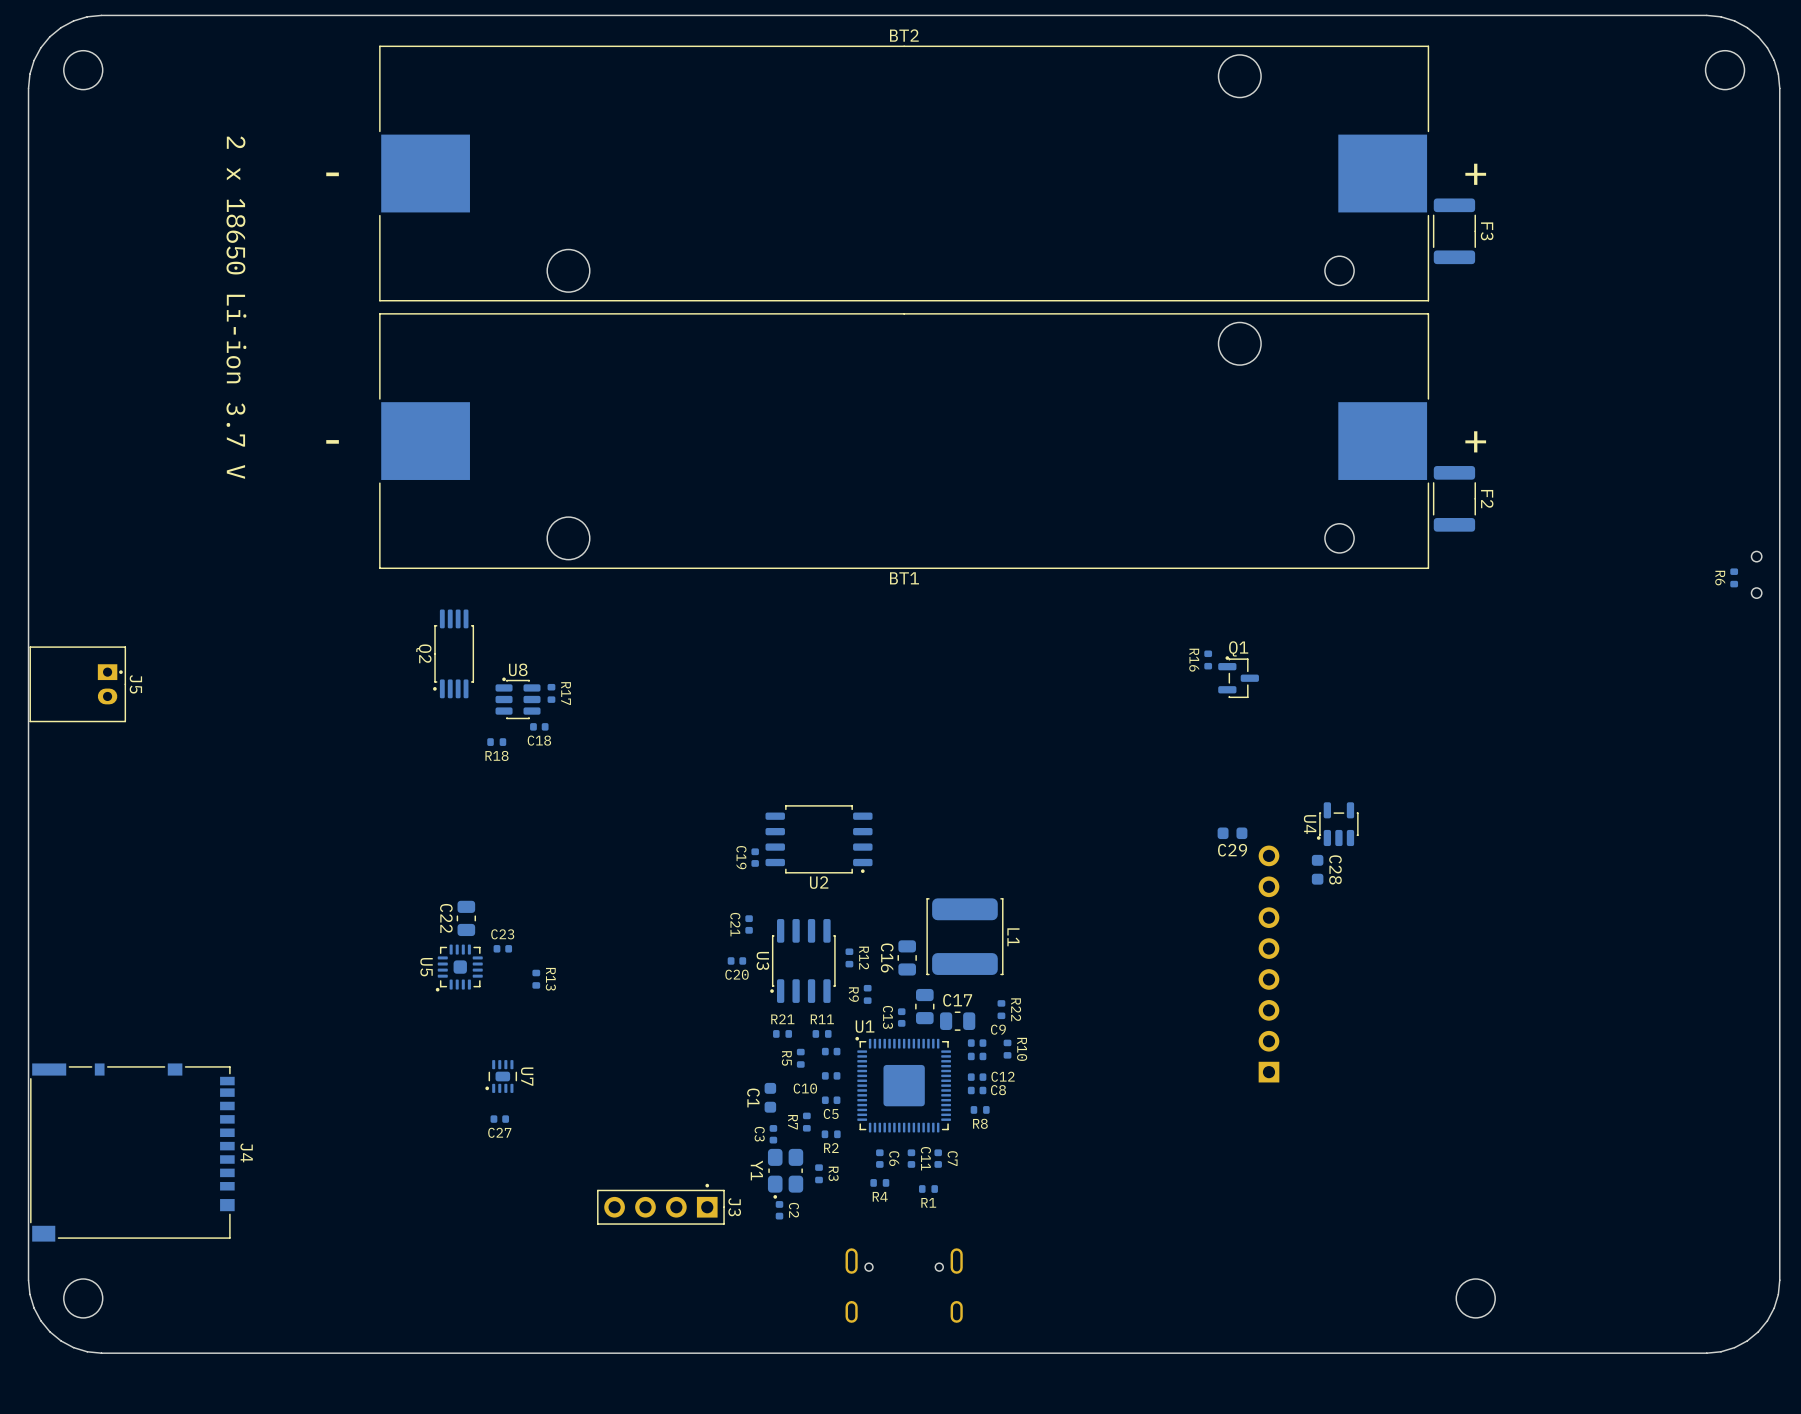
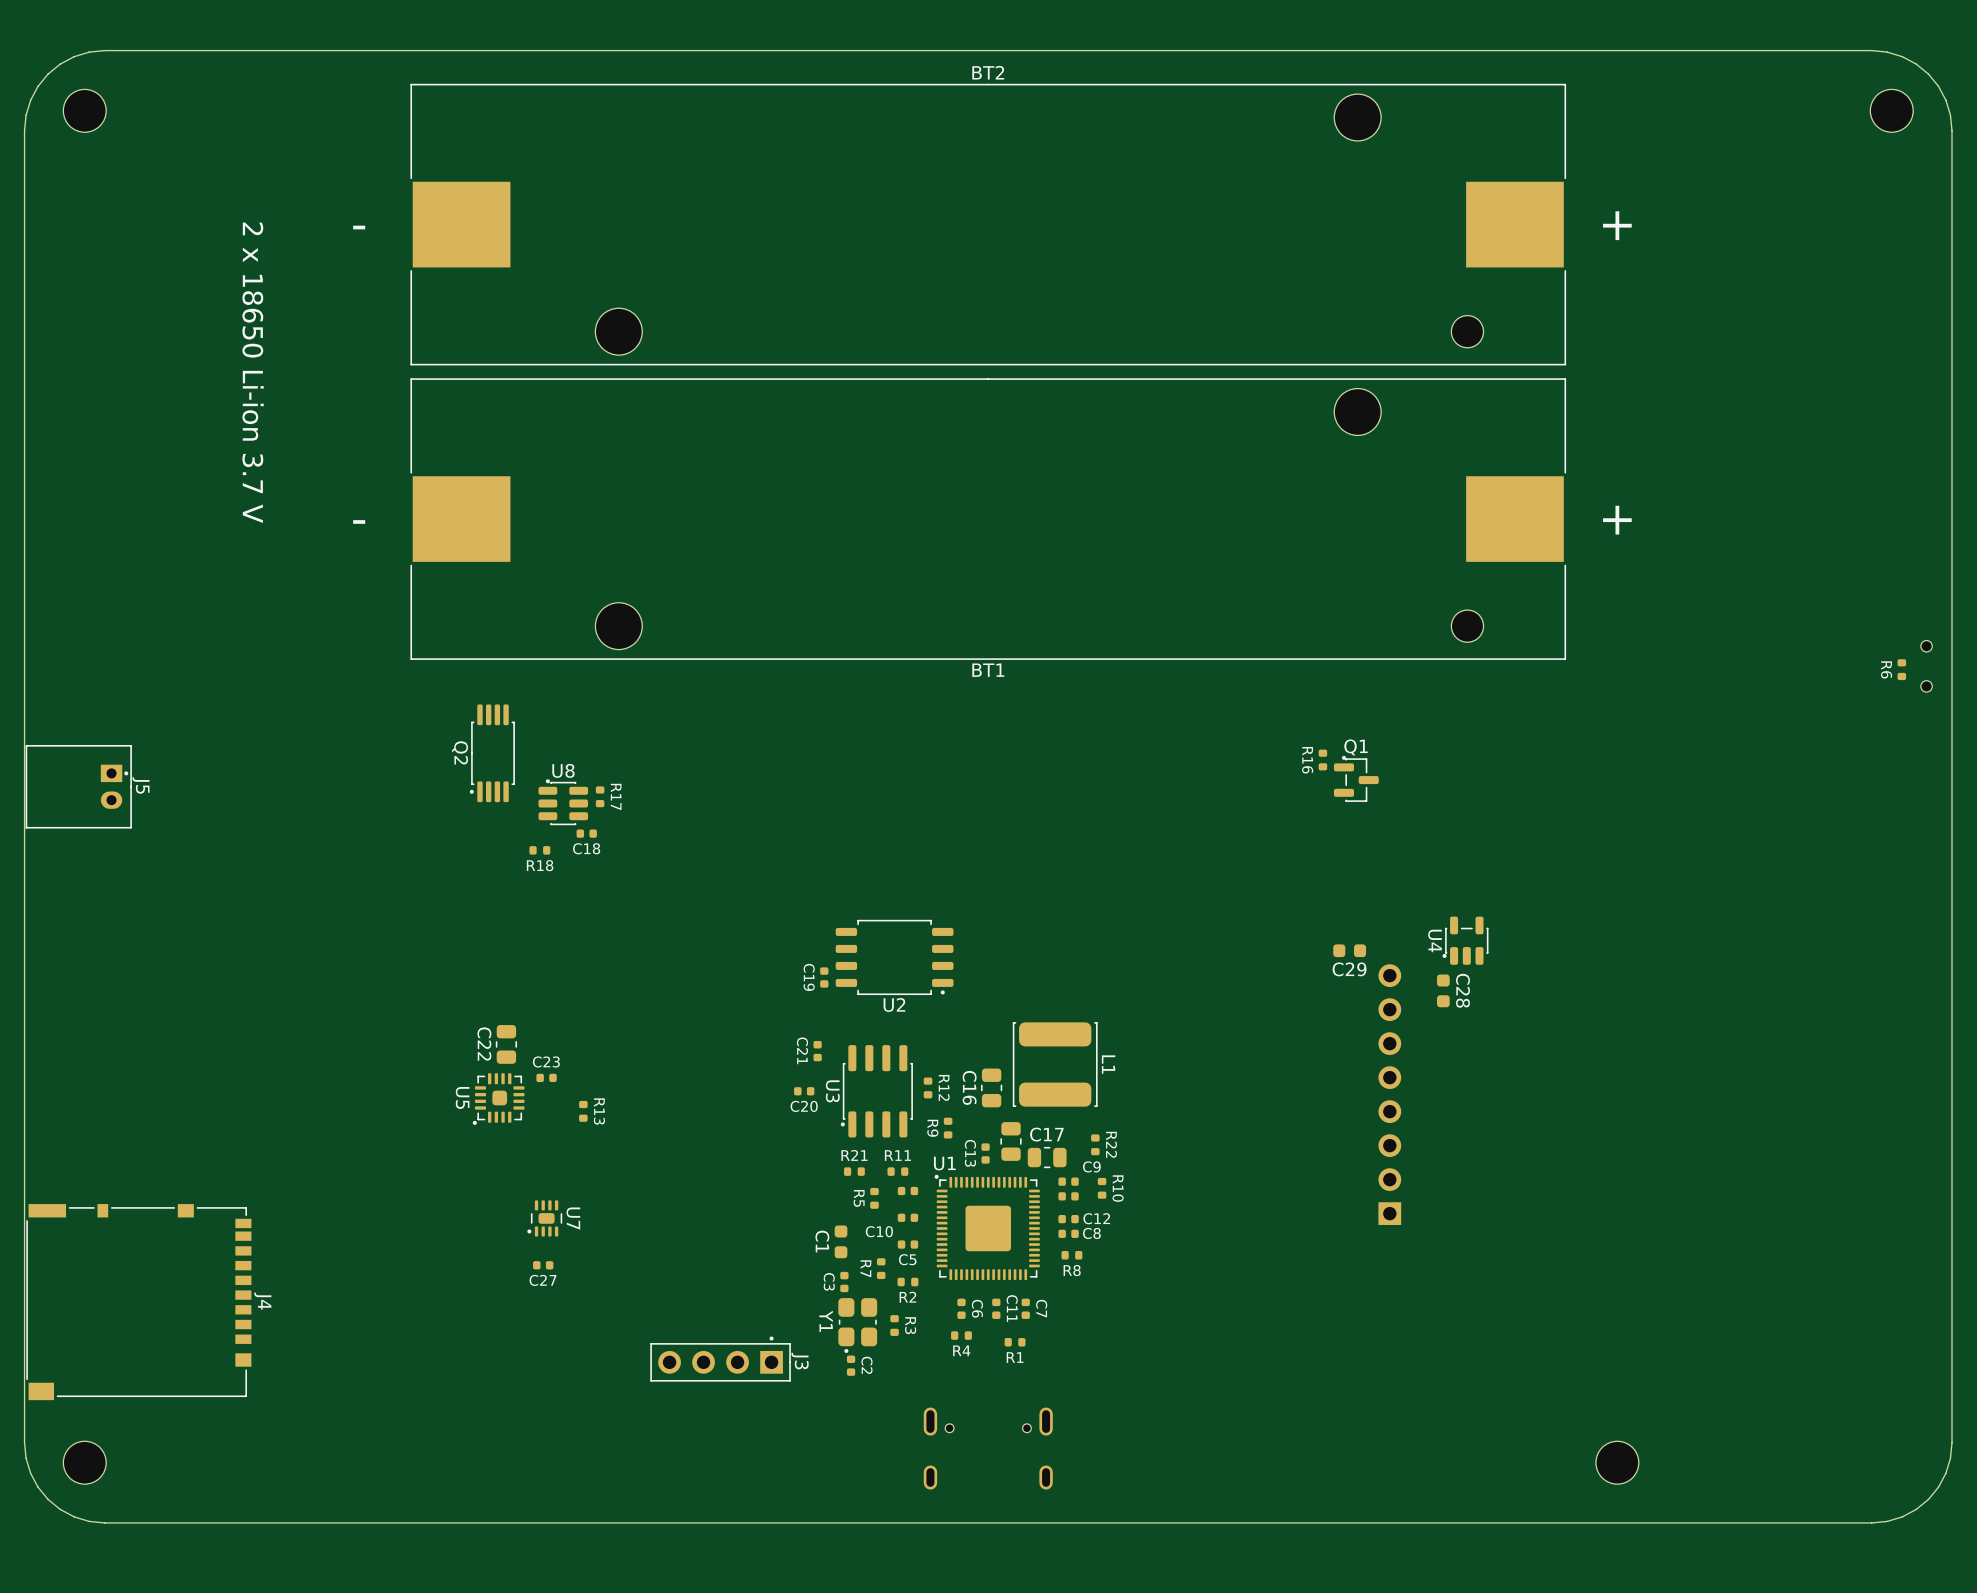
F3: (1454, 231) -> none
F2: (1454, 498) -> none

